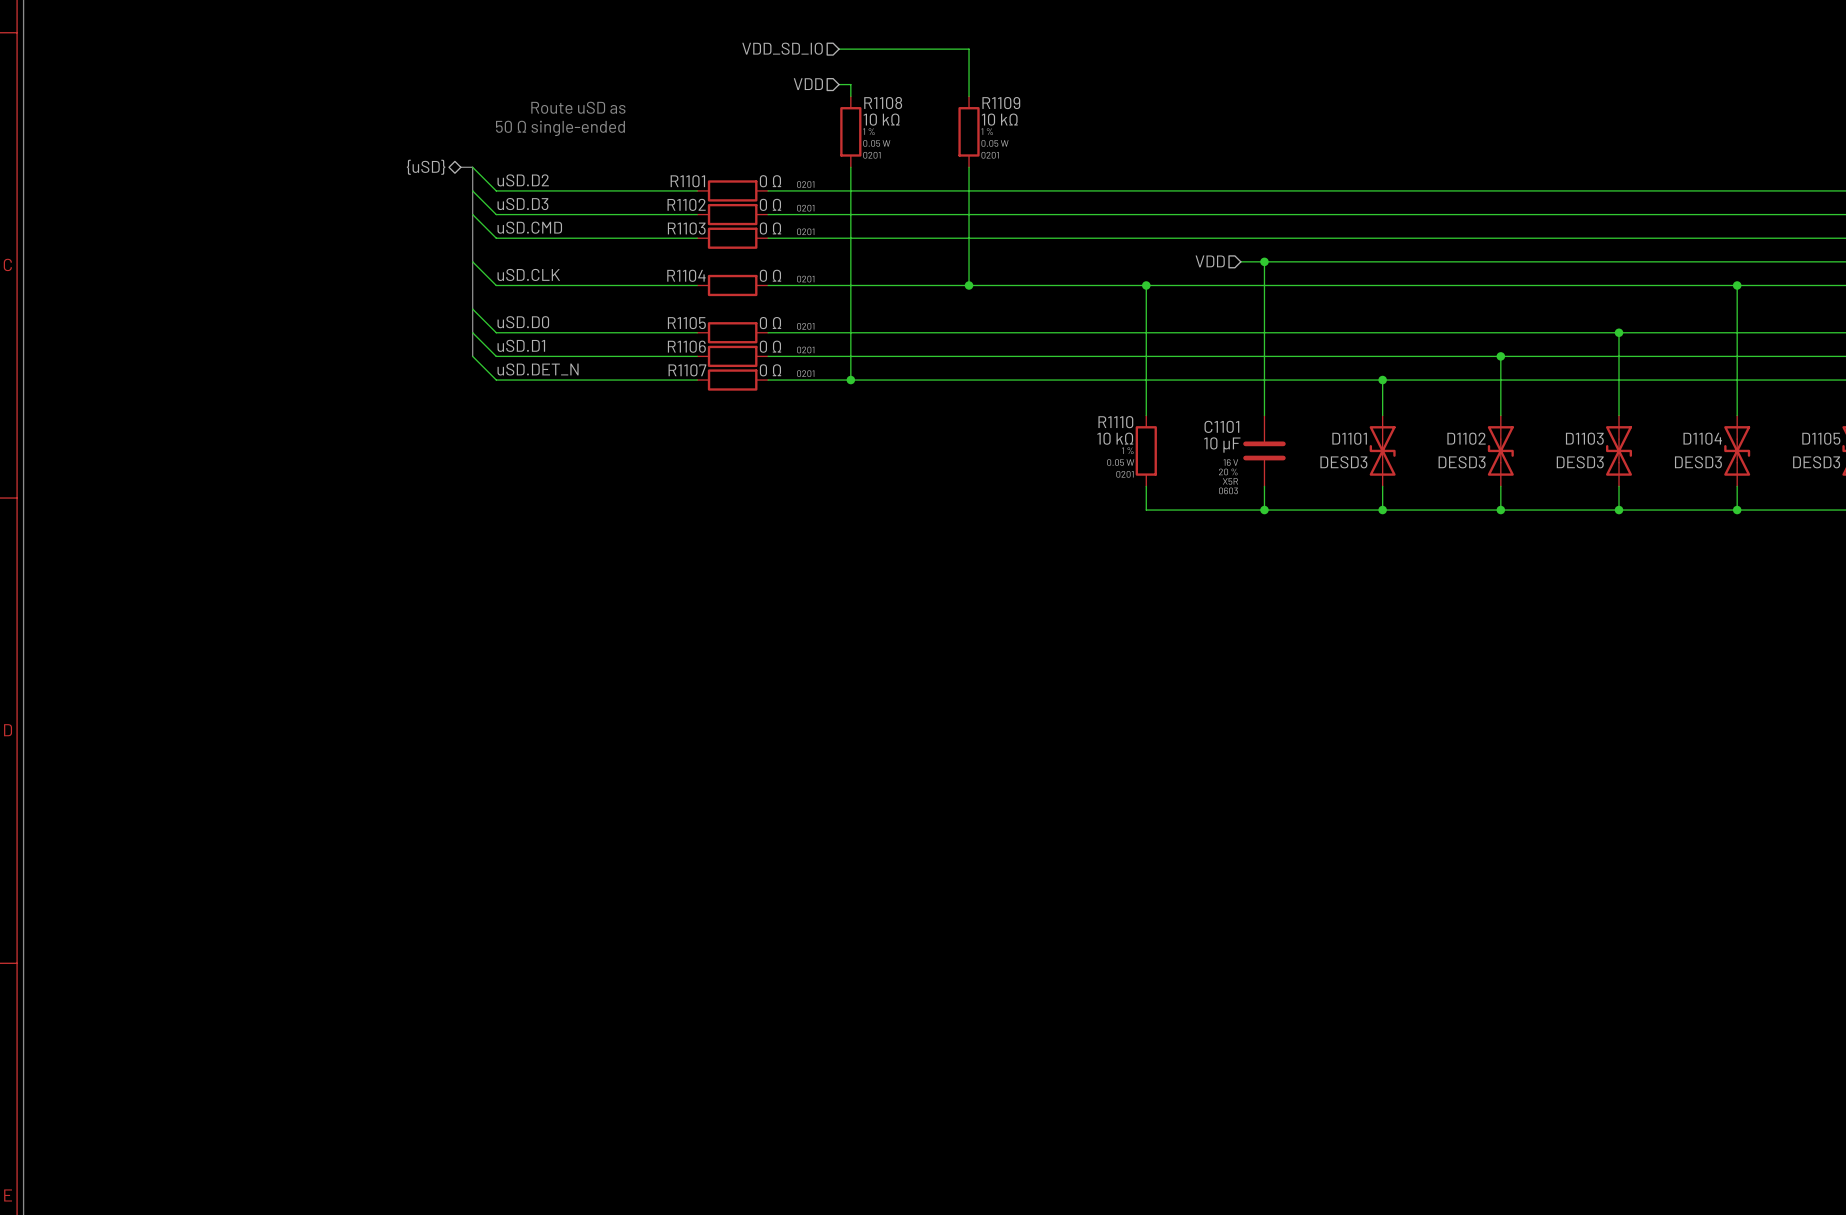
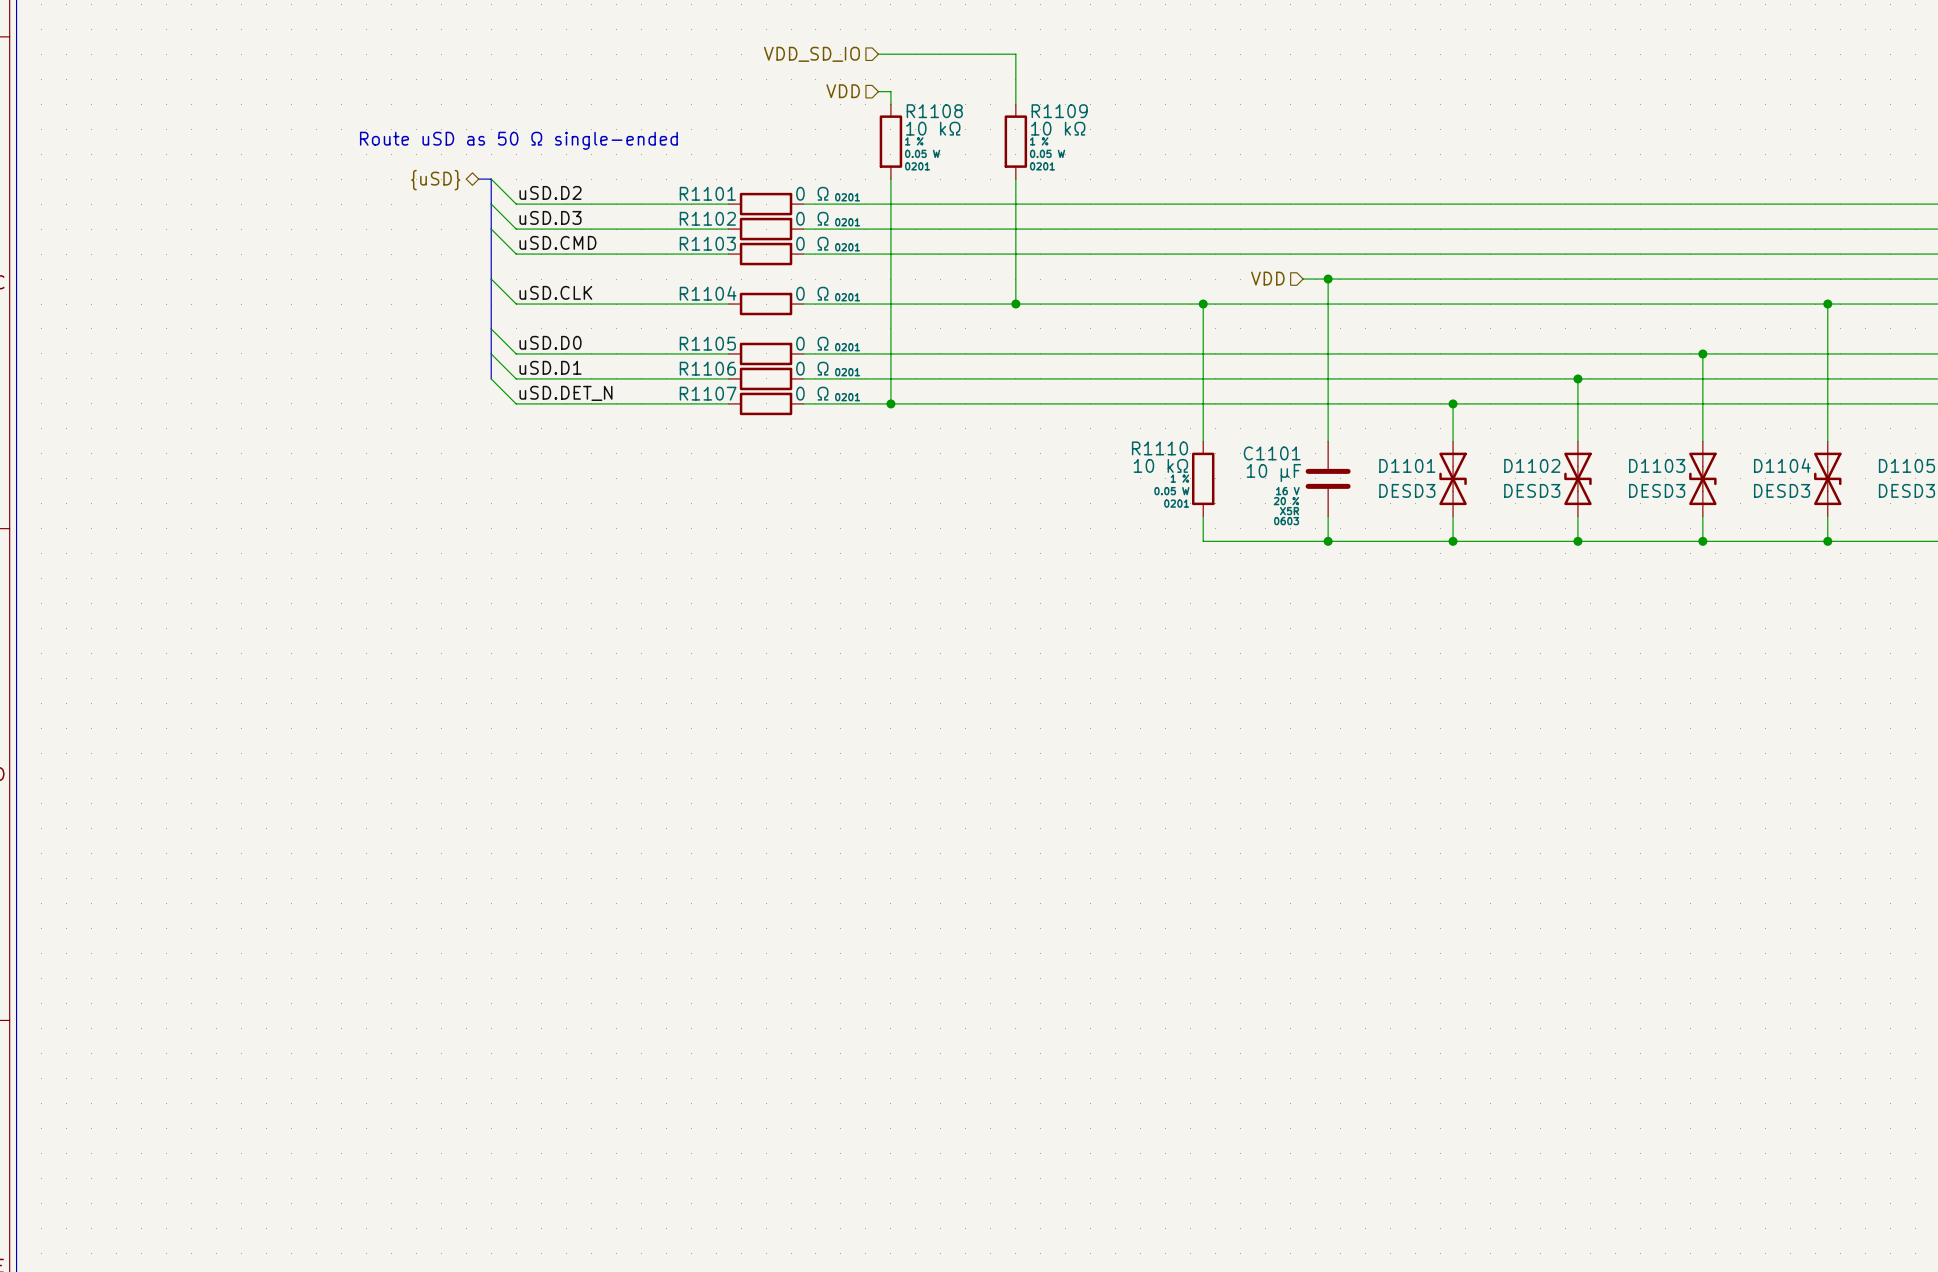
text: Route uSD as (578, 107) -> none
text: 50 Ω single-ended (560, 128) -> Route uSD as 50 Ω single-ended (518, 140)

